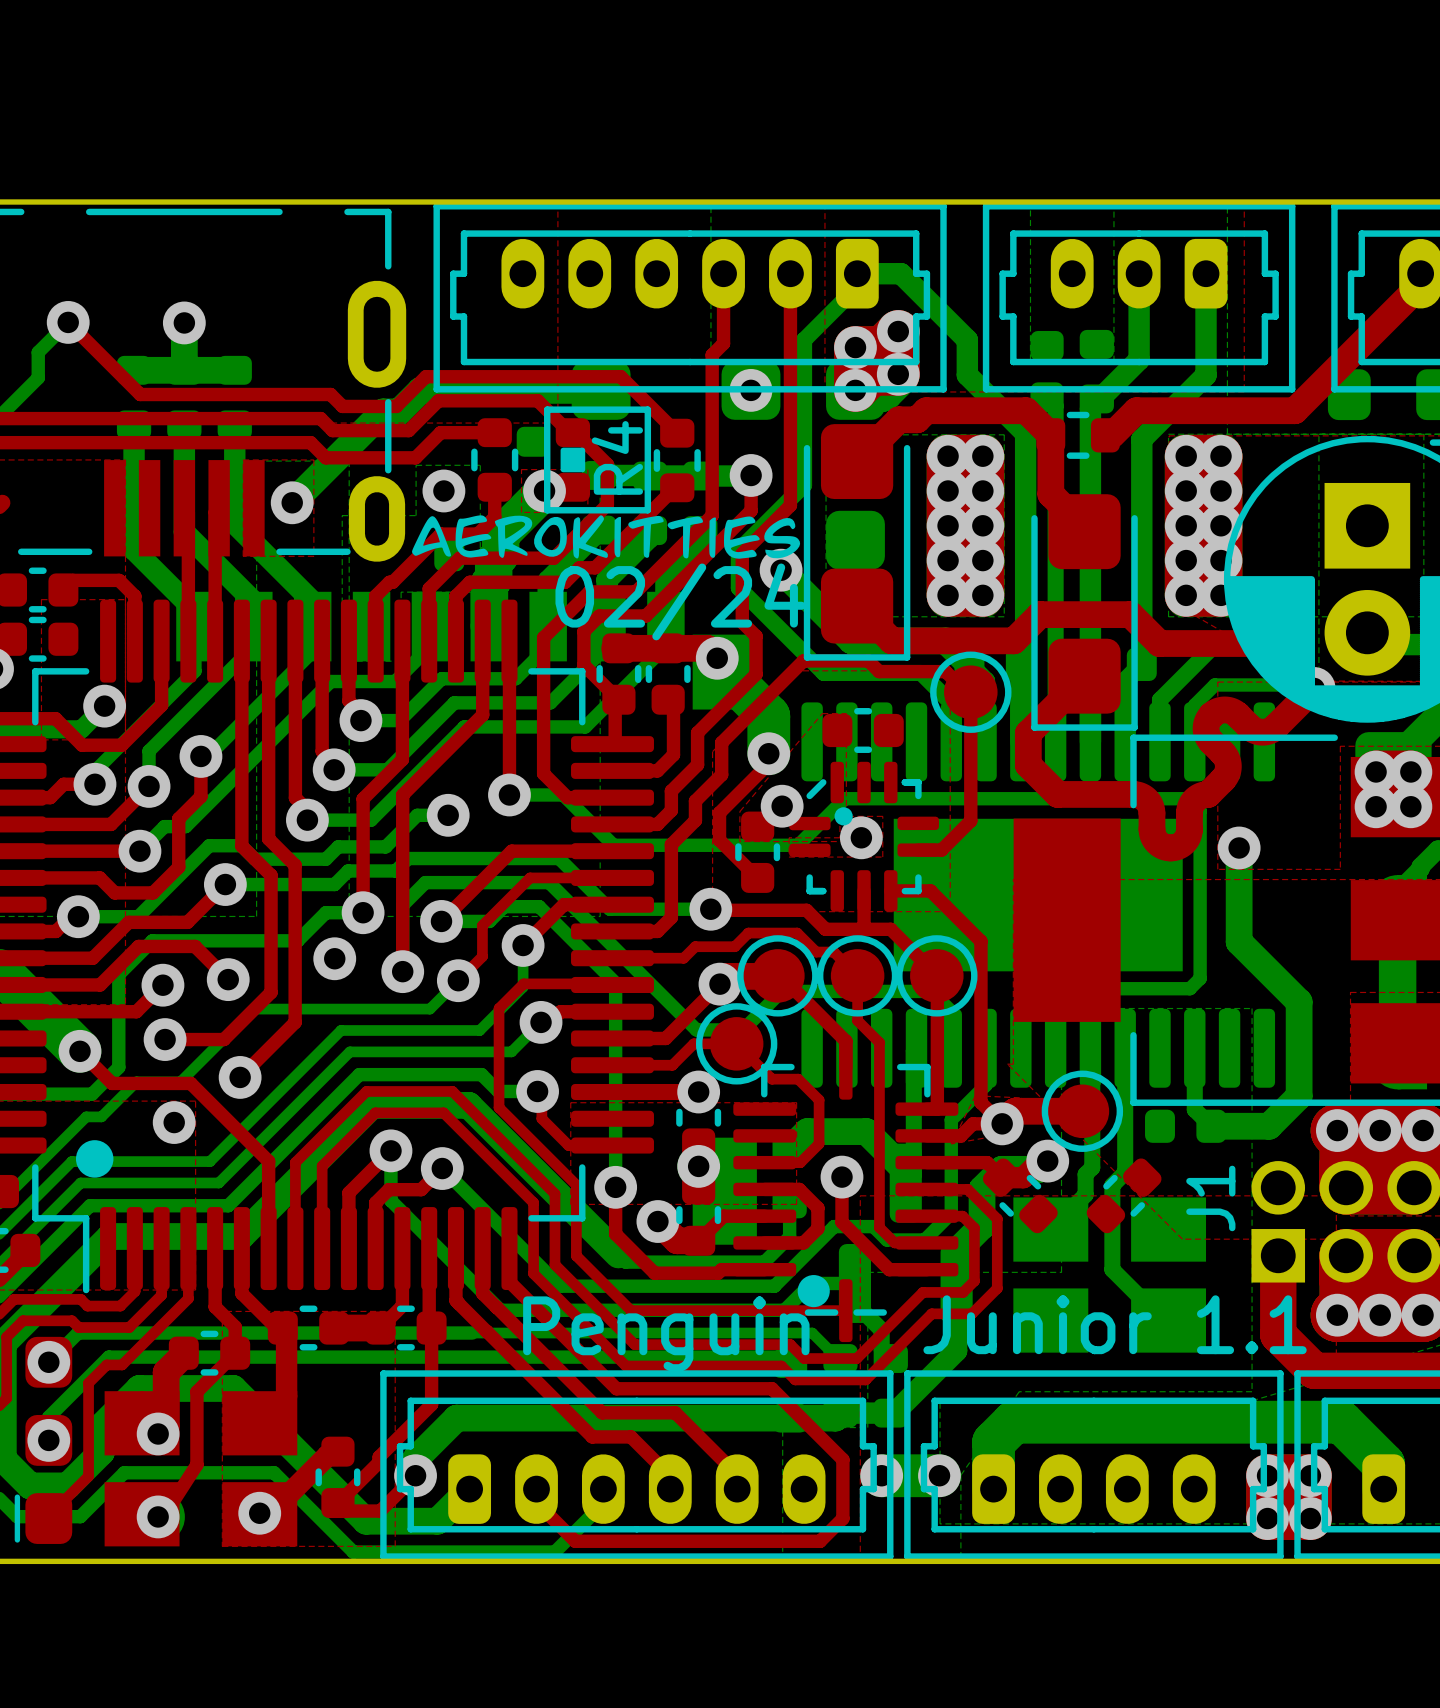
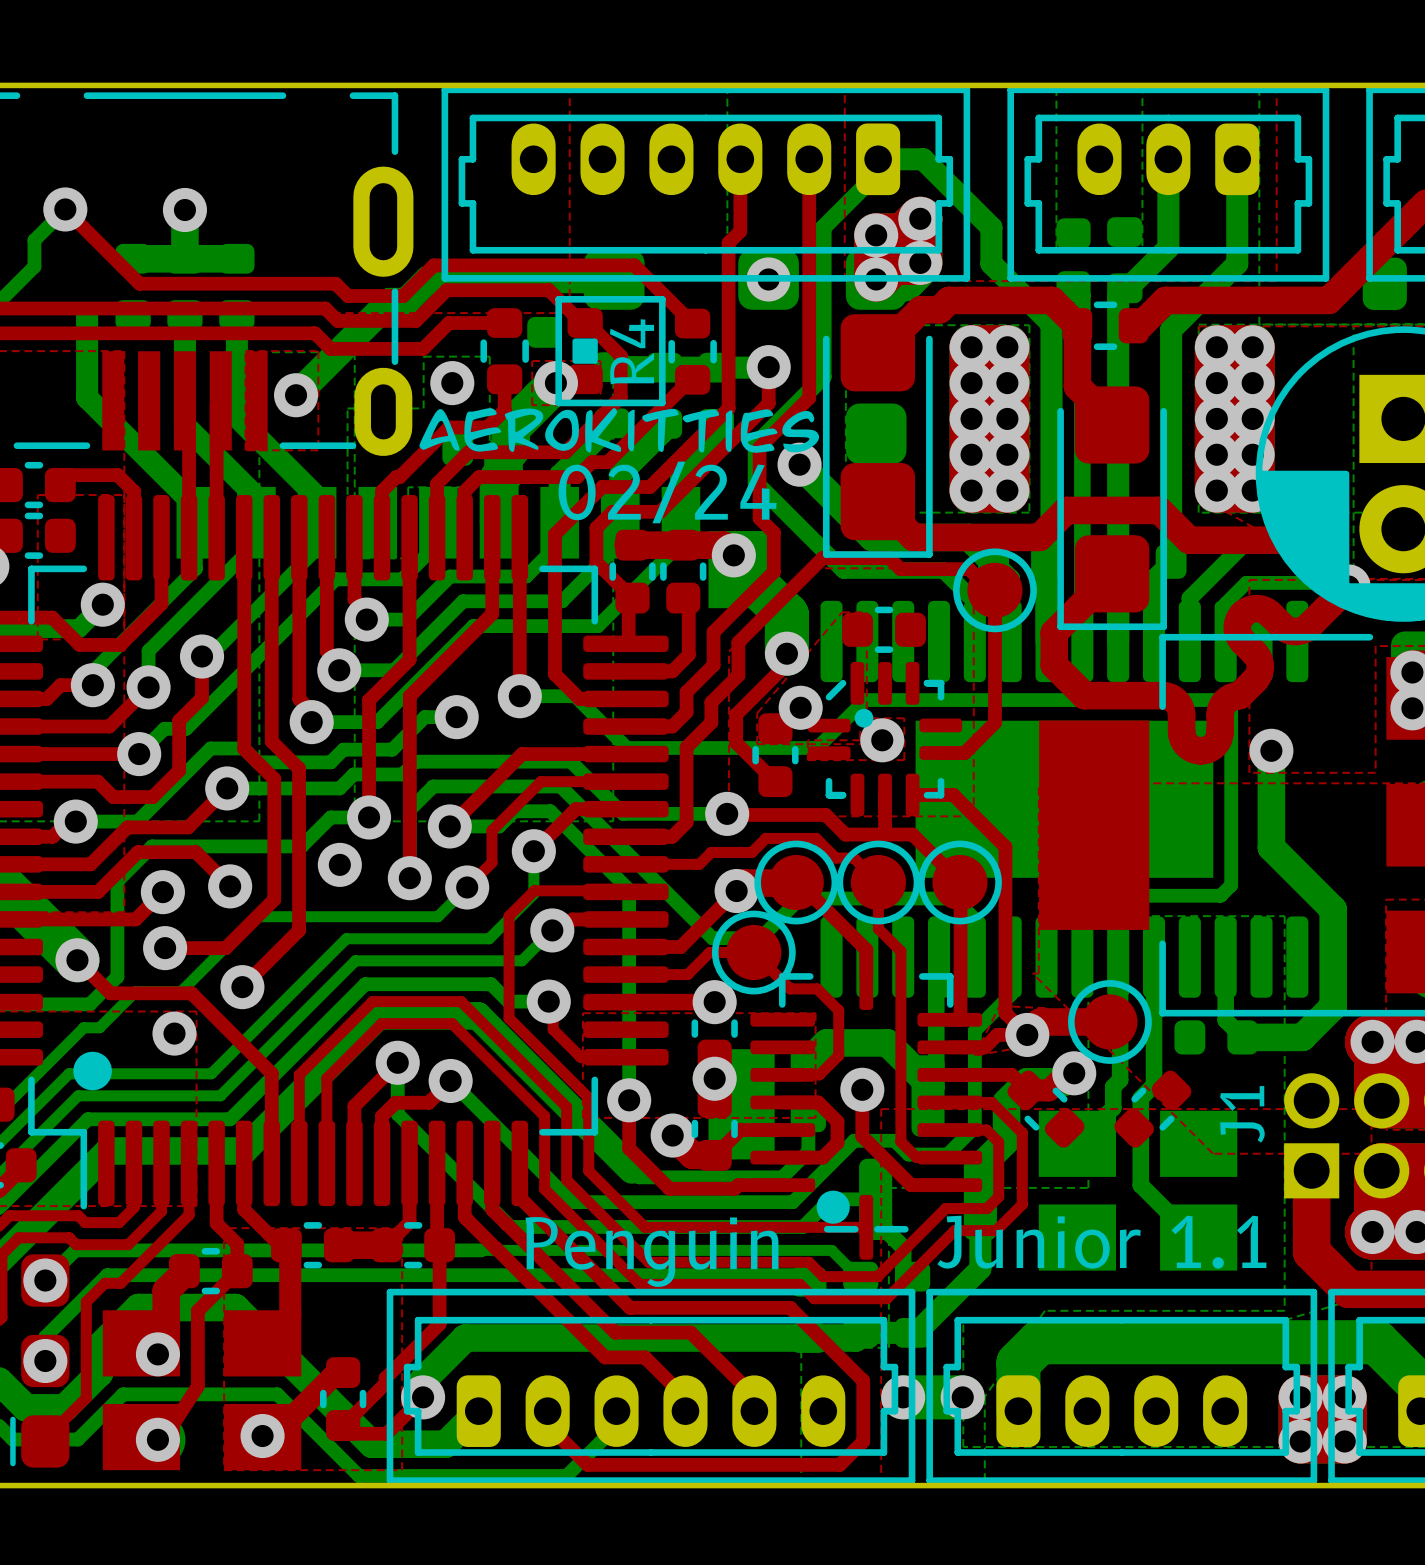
bottom track: (134, 424) (134, 549) -> (87, 315) (87, 397) (133, 443)

